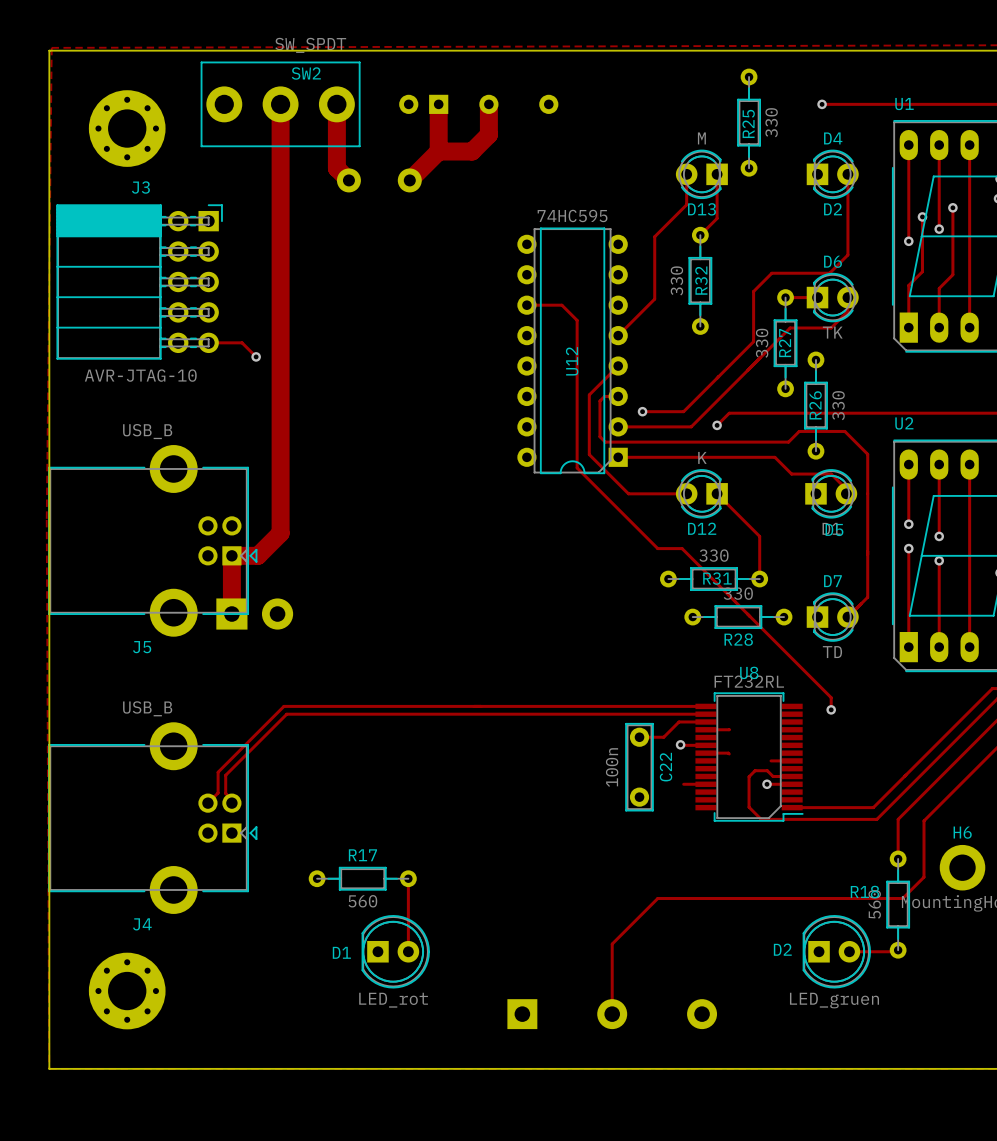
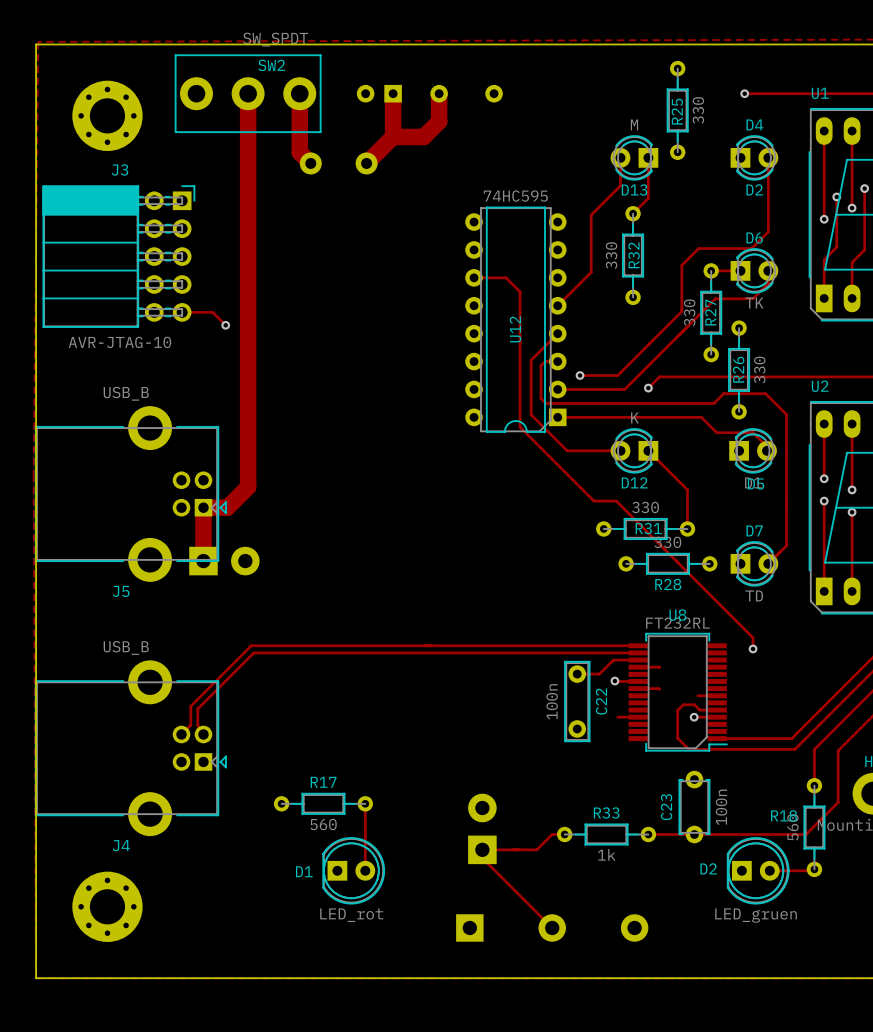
C23: none -> 100n (694, 807)
track: (902, 898) (657, 898) (612, 944) (612, 1014) -> (818, 821) (806, 834) (648, 834)
part: none -> (482, 828)
track: none -> (564, 834) (552, 834) (536, 849) (482, 849) (482, 858) (552, 927)
R33: none -> 1k (606, 834)

